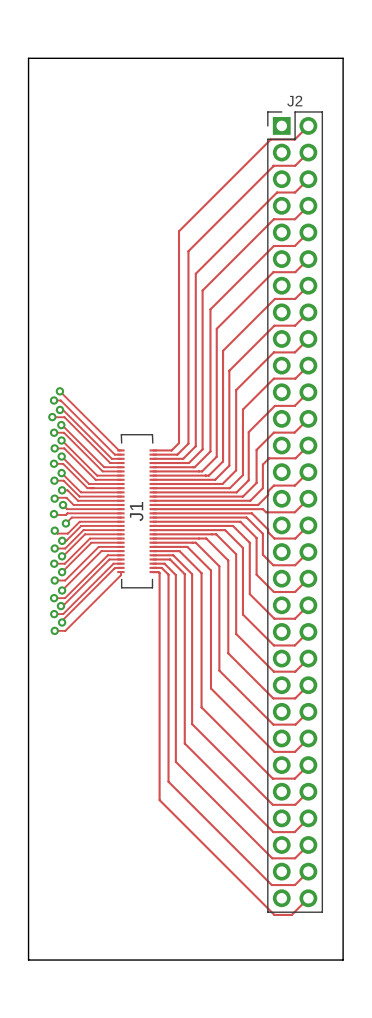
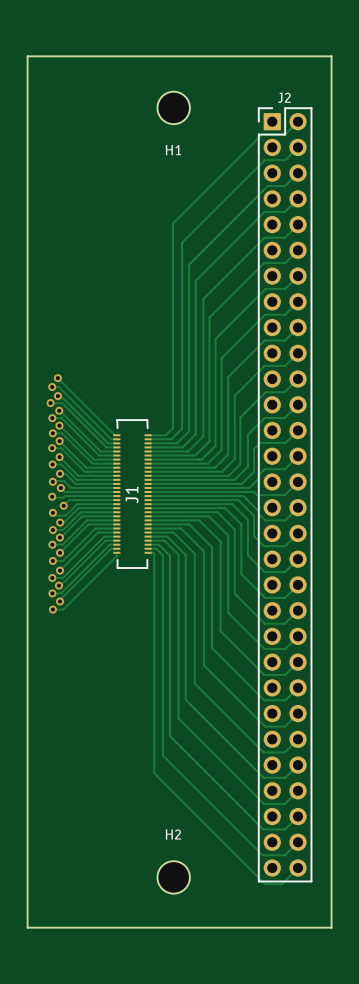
H1: none -> (173, 107)
H2: none -> (173, 877)

